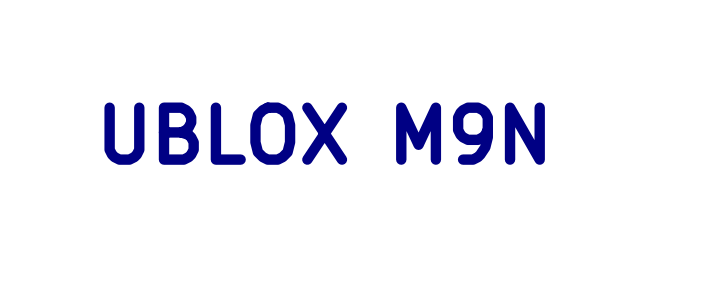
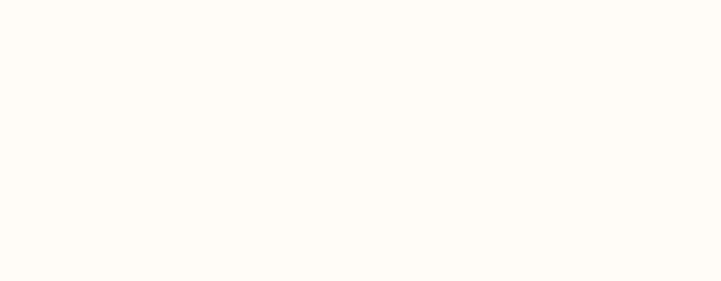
text: UBLOX M9N (324, 133) -> none

